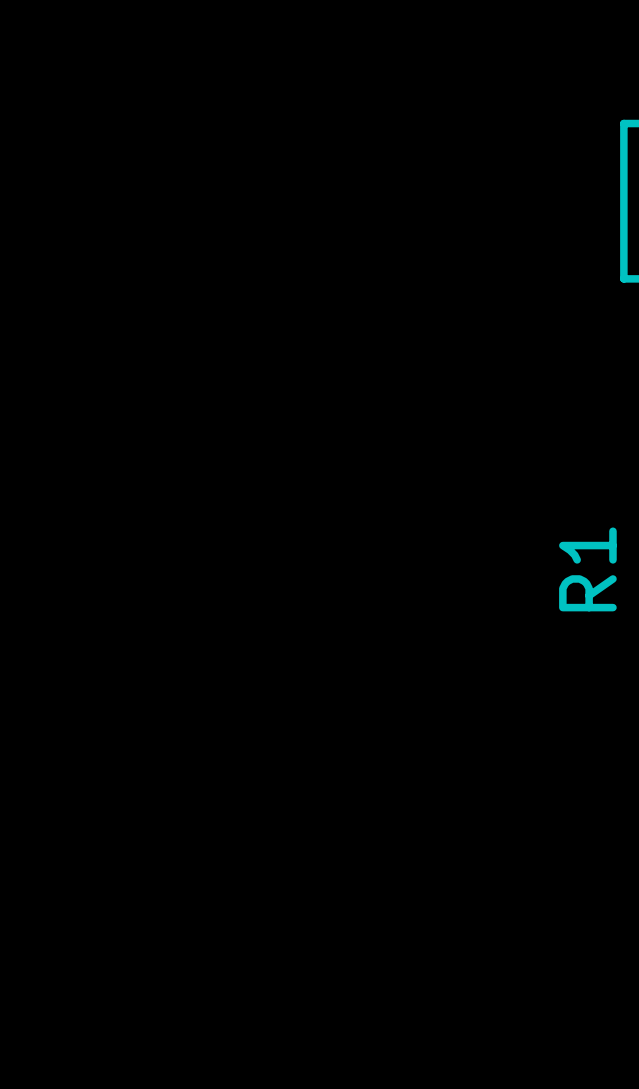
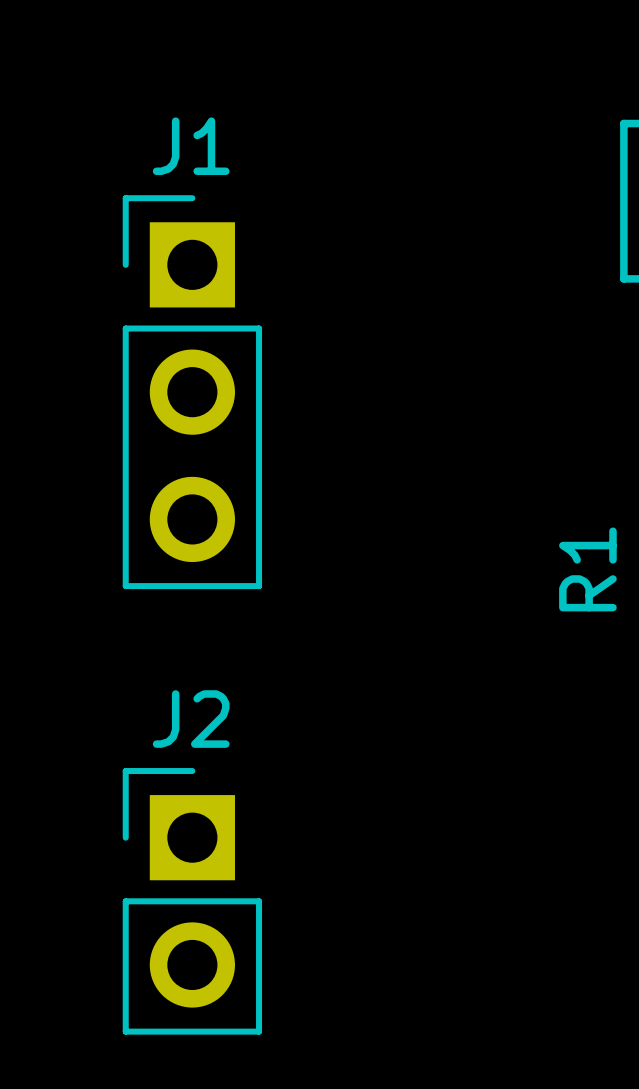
J1: none -> (192, 392)
J2: none -> (192, 901)

